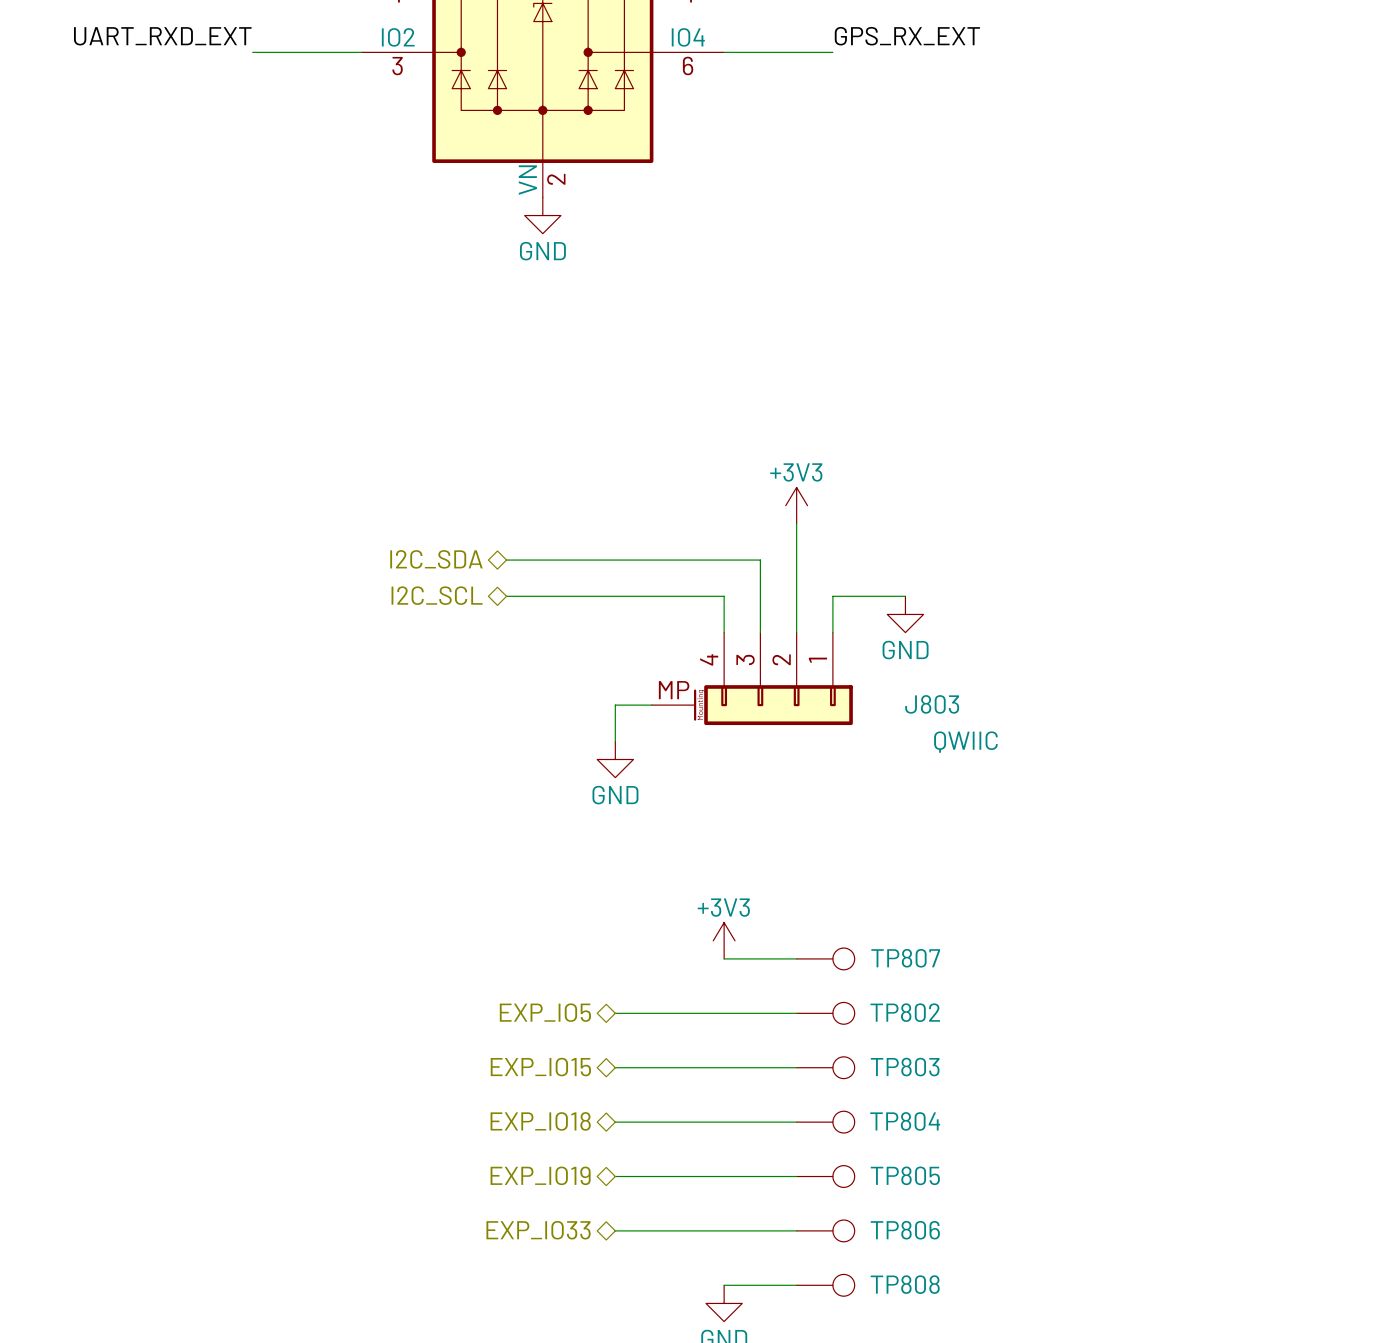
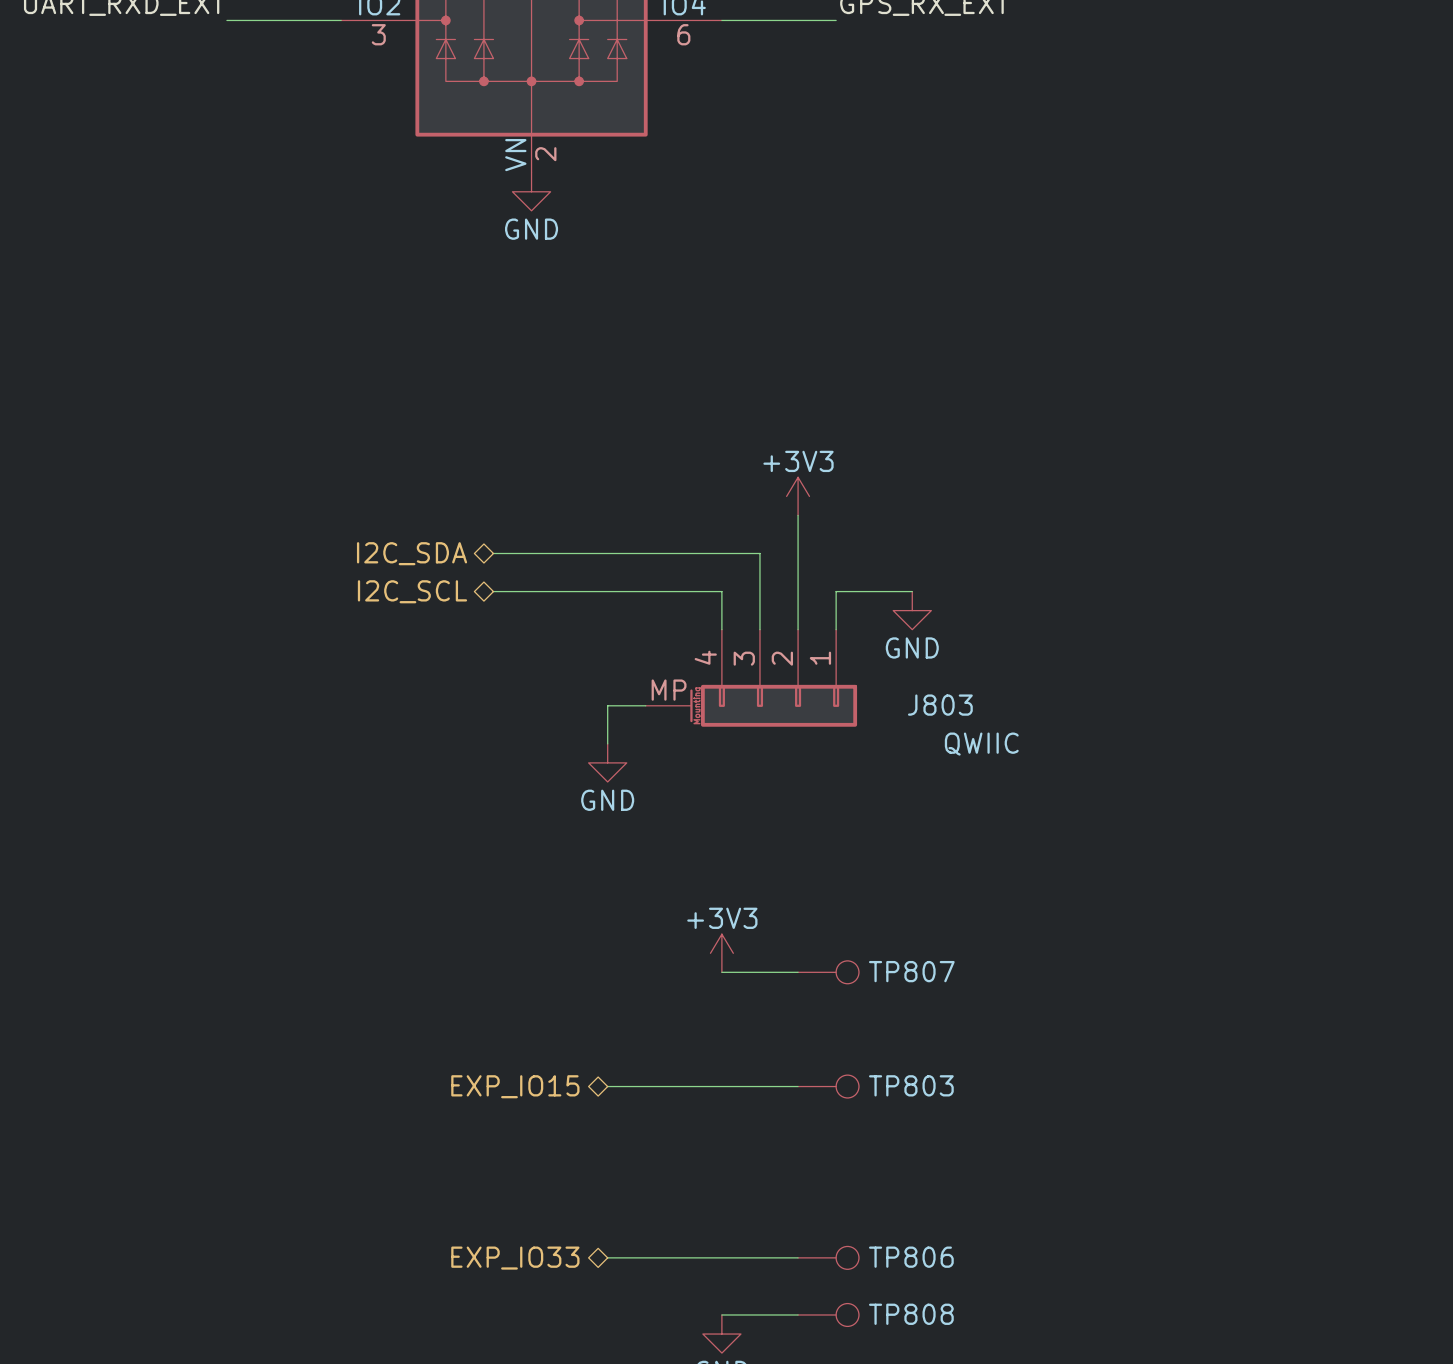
hierarchical label: EXP_IO5 (545, 1012) -> none
wire: (615, 1013) (796, 1013) -> none
TP802: (825, 1013) -> none
hierarchical label: EXP_IO18 (540, 1121) -> none
wire: (615, 1122) (796, 1122) -> none
TP804: (825, 1122) -> none
hierarchical label: EXP_IO19 (540, 1175) -> none
wire: (615, 1176) (796, 1176) -> none
TP805: (825, 1176) -> none

